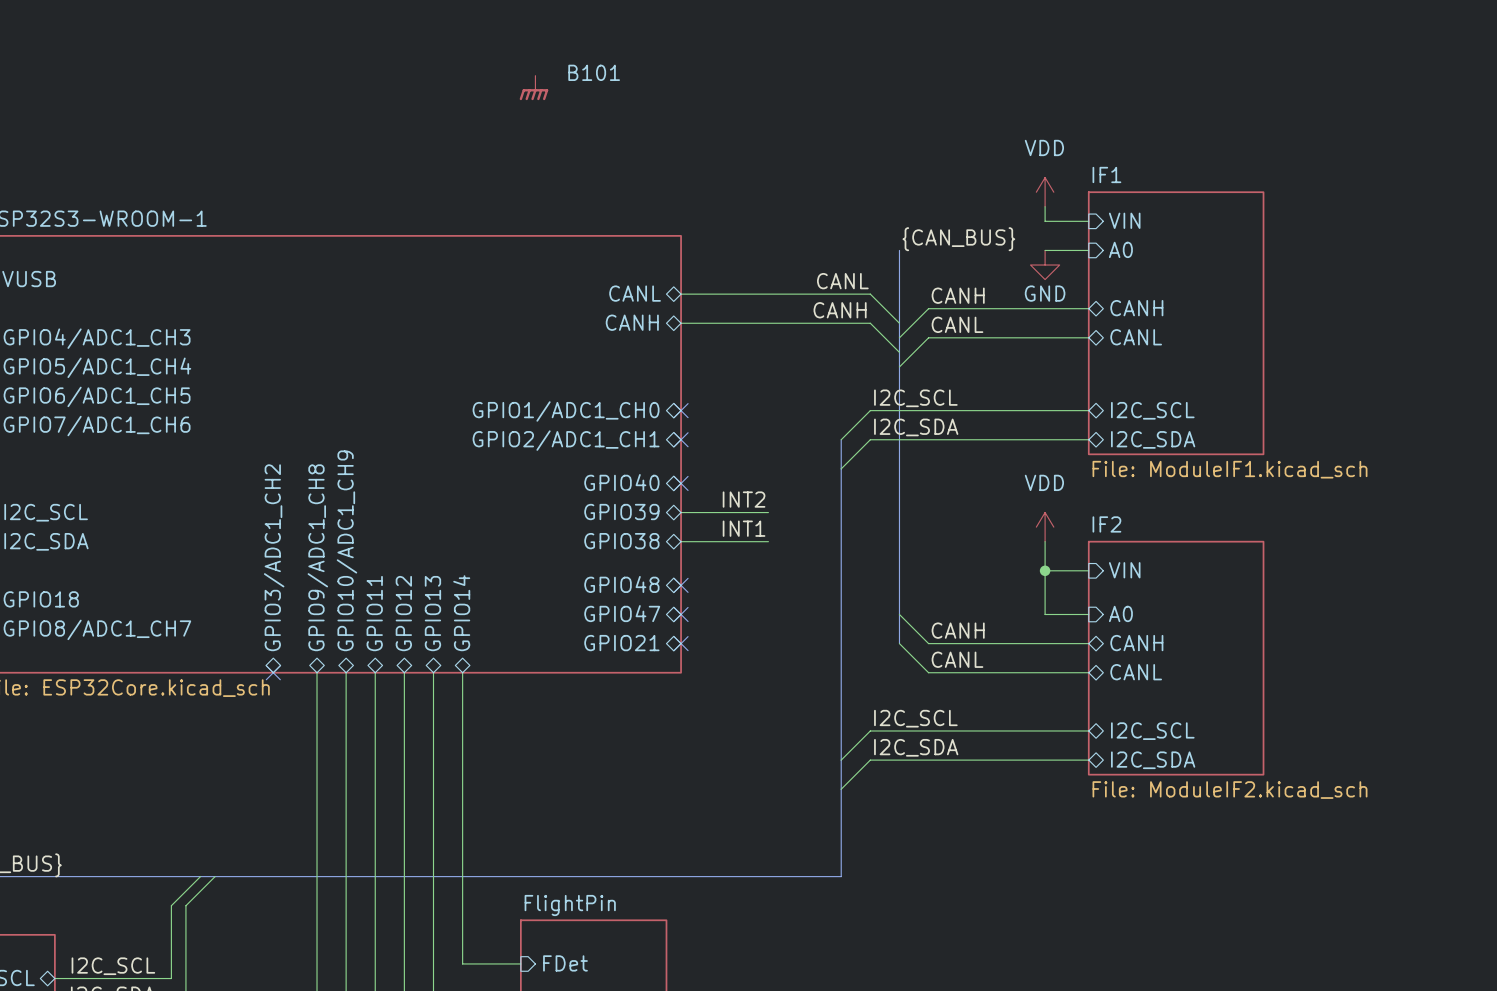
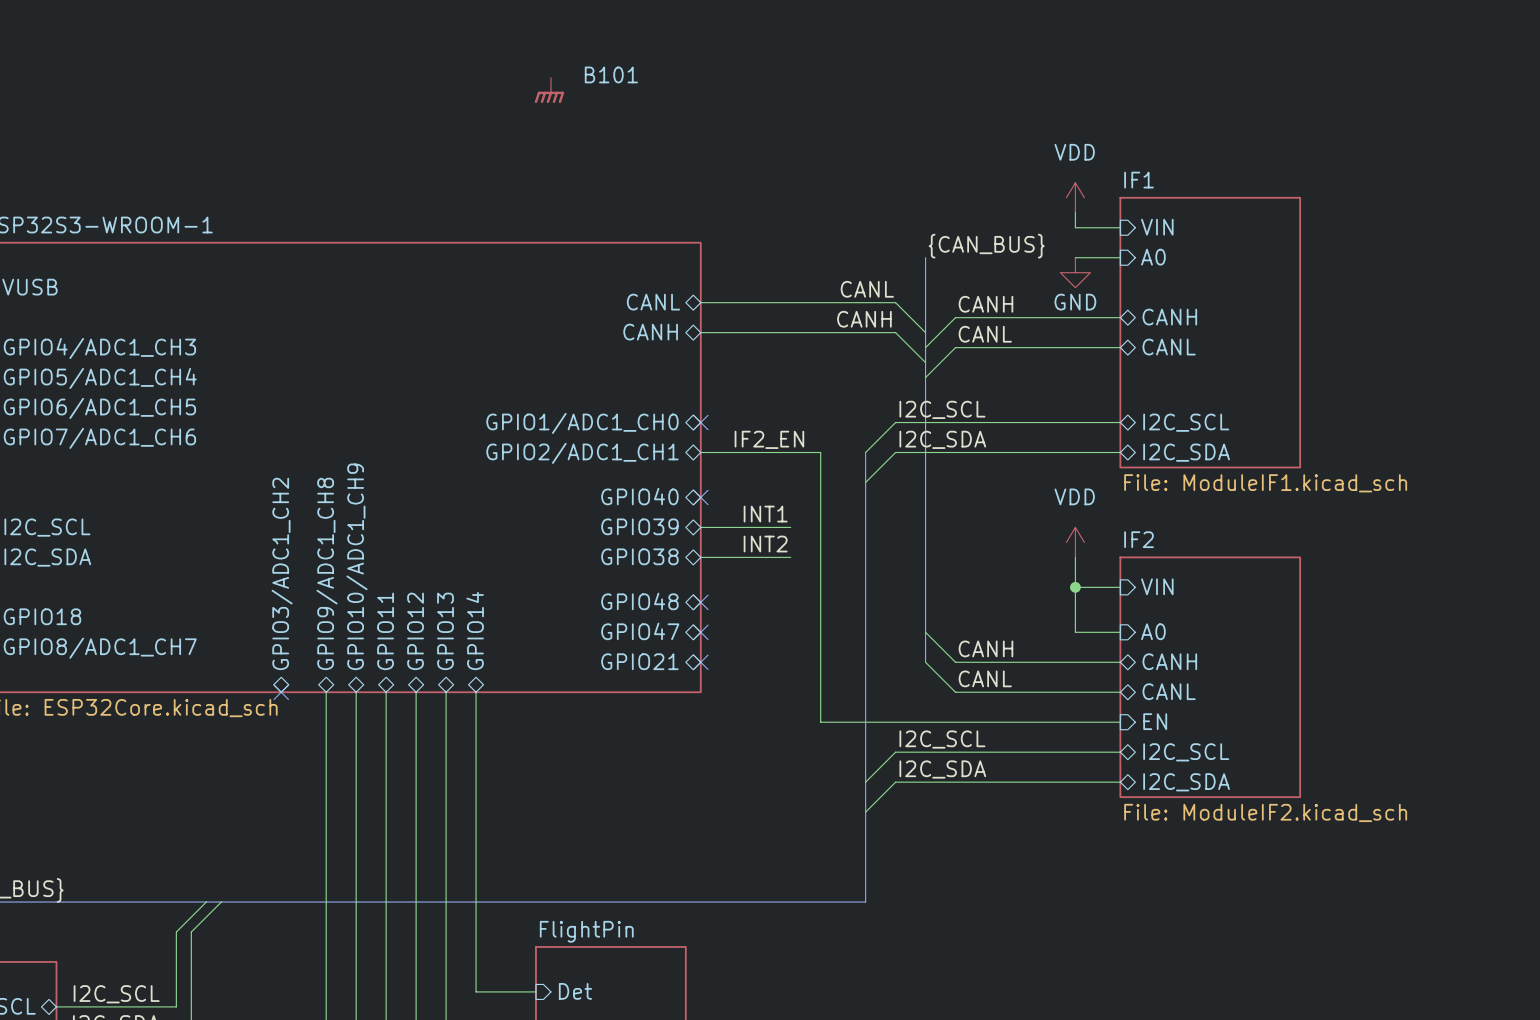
label: none -> IF2_EN (769, 439)
wire: none -> (700, 452) (820, 452) (820, 722) (1120, 722)
no-connect mark: (681, 439) -> none
label: INT2 (744, 499) -> INT1 (765, 514)
label: INT1 (744, 528) -> INT2 (765, 544)
sheet pin: none -> EN (1155, 721)
sheet pin: FDet (565, 963) -> Det (575, 991)

